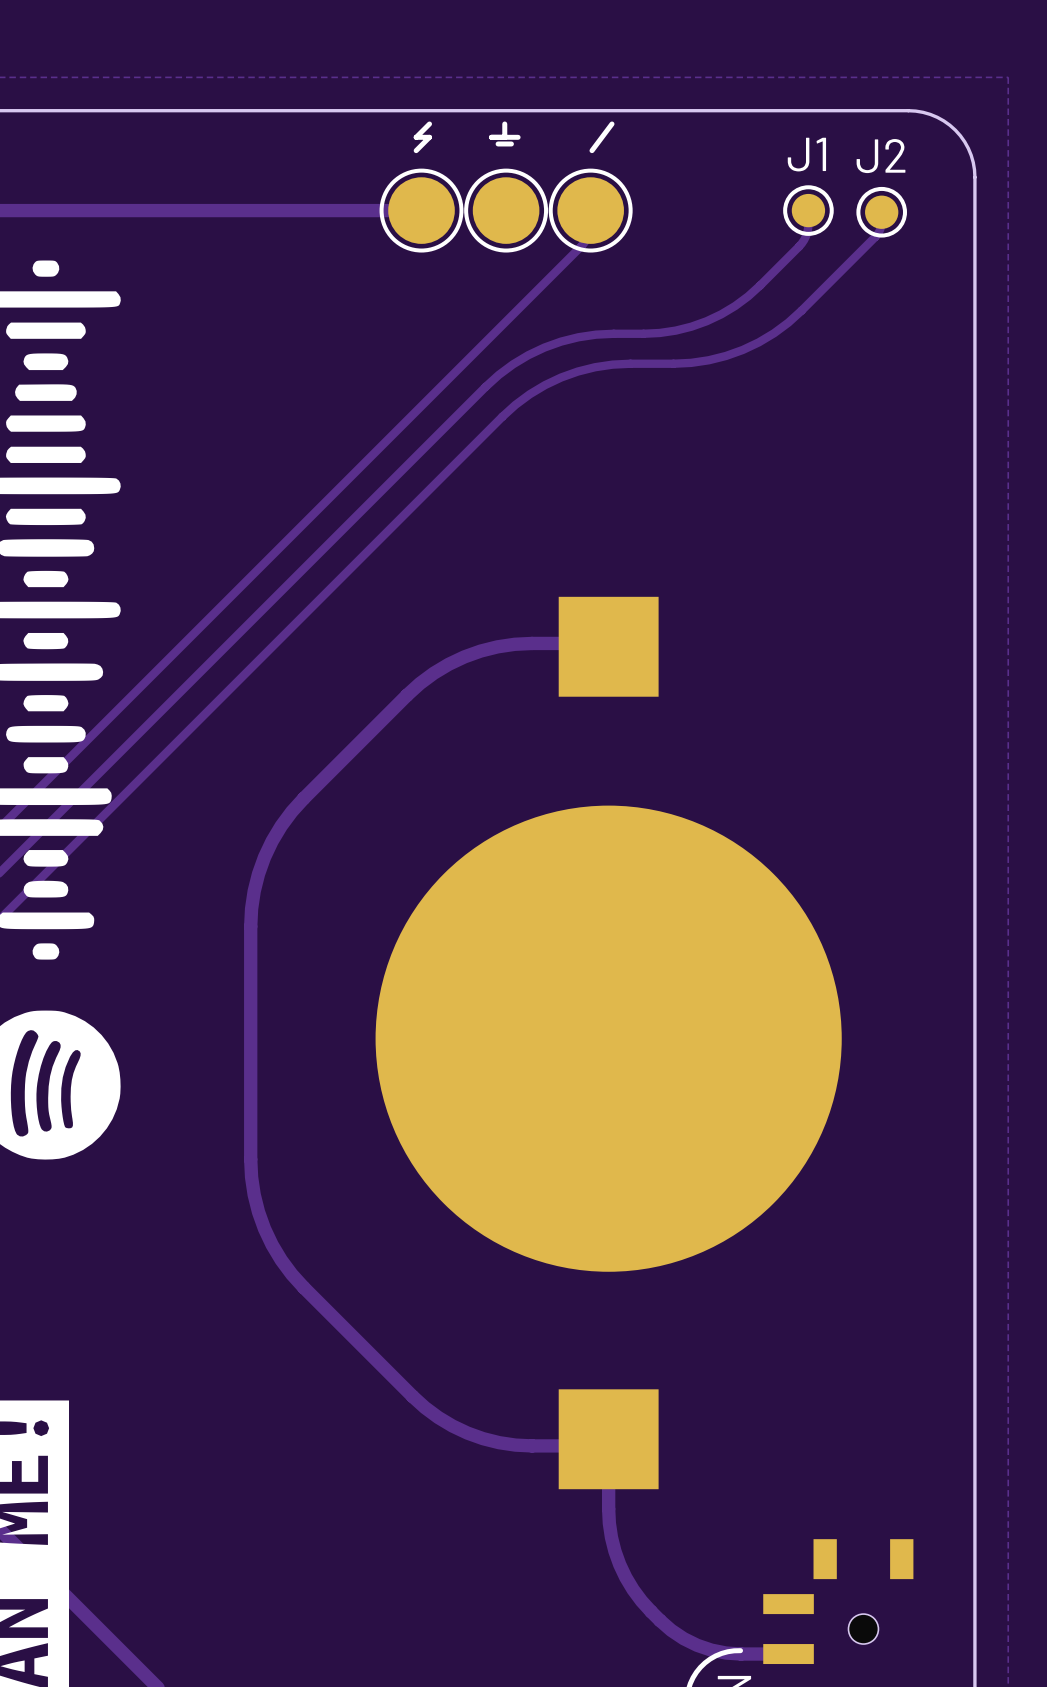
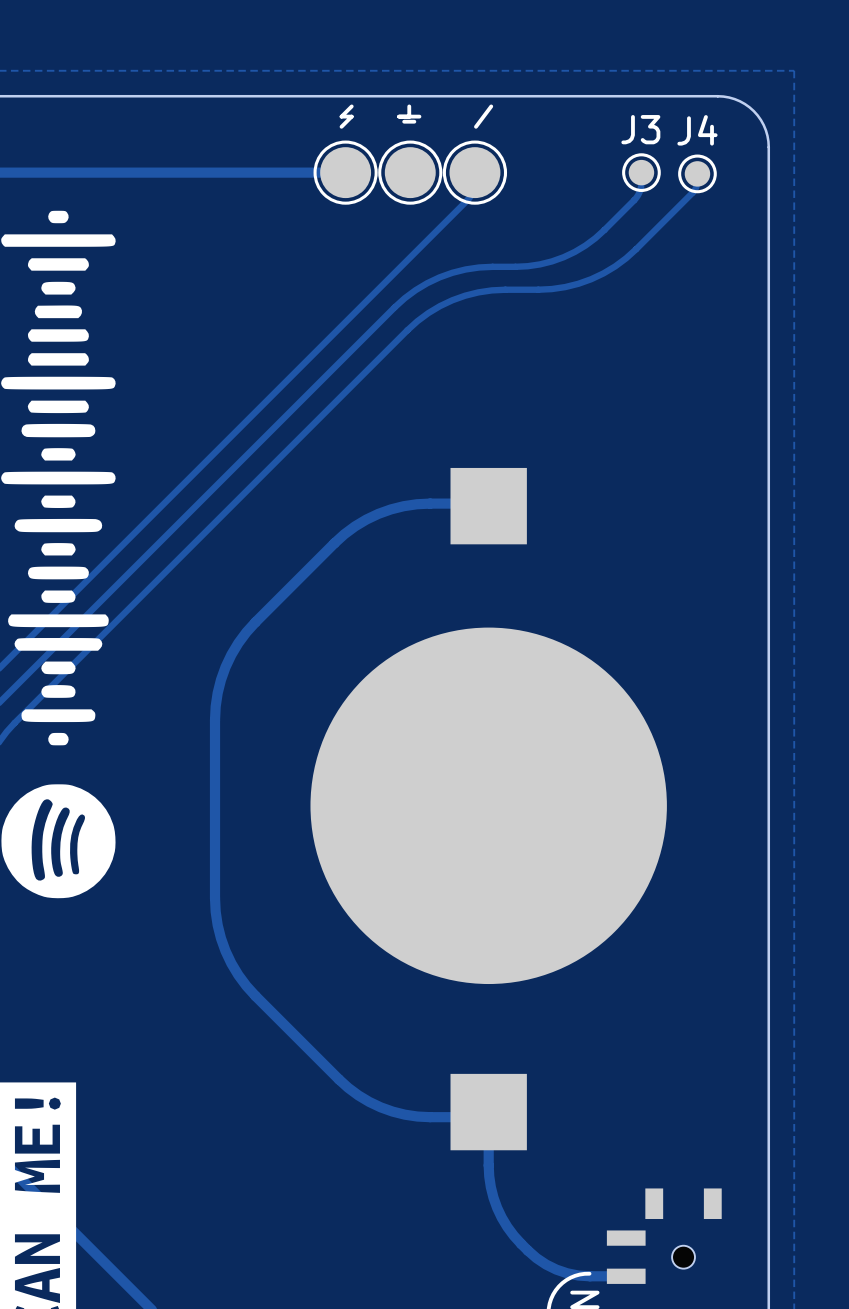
J1 name: J1 (806, 154) -> J3 (640, 129)
J2 name: J2 (881, 156) -> J4 (697, 130)

